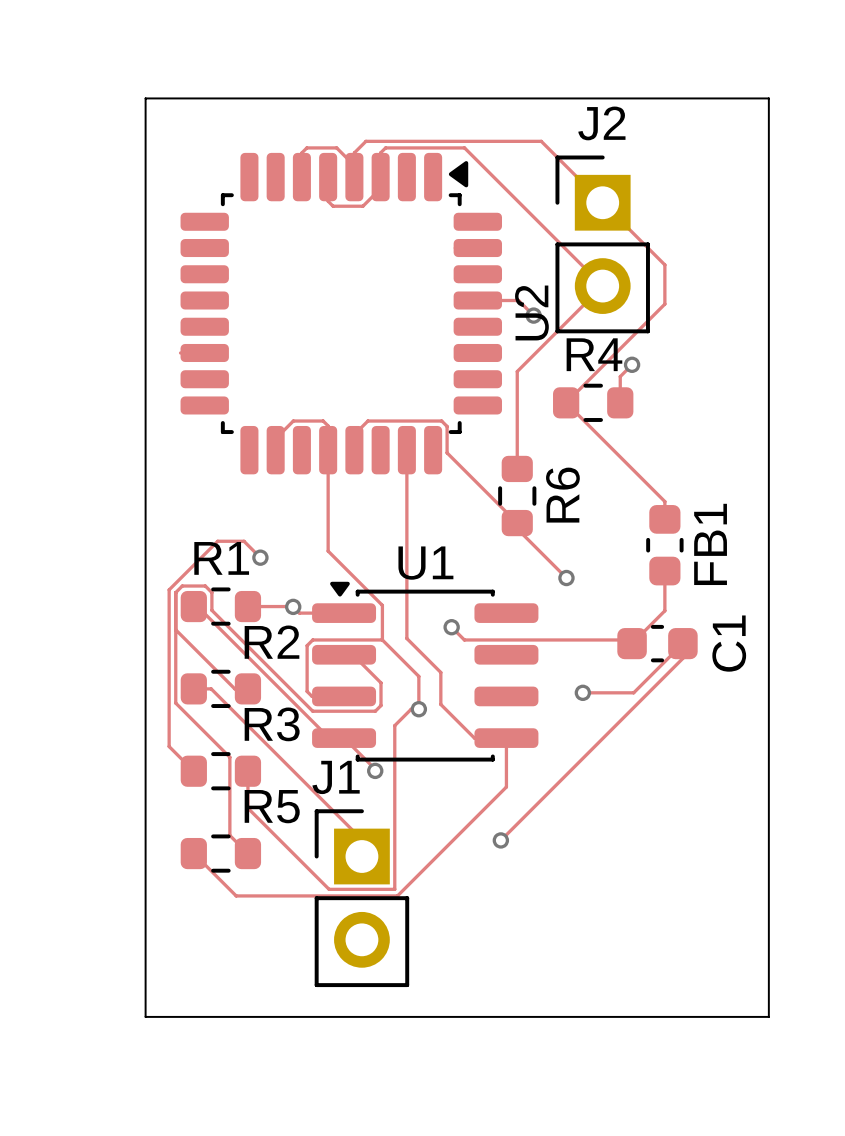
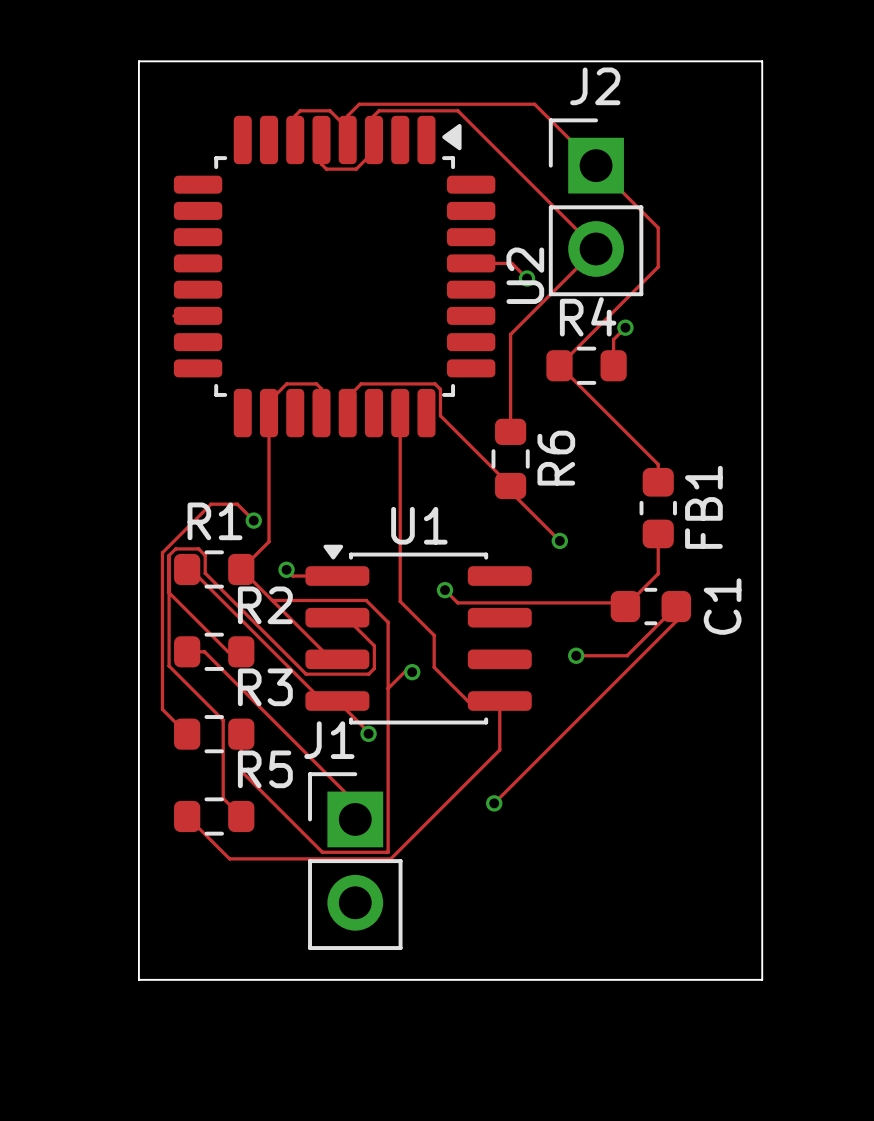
track: (328, 450) (328, 551) (382, 605) (382, 639) -> none
track: (247, 606) (292, 606) -> none
track: none -> (272, 600) (366, 600) (388, 622) (388, 688)
track: (382, 639) (312, 639) (307, 645) (307, 691) (312, 696) (337, 696) -> (269, 413) (269, 541) (241, 569) (331, 659)
track: (382, 639) (418, 676) (418, 709) -> none

